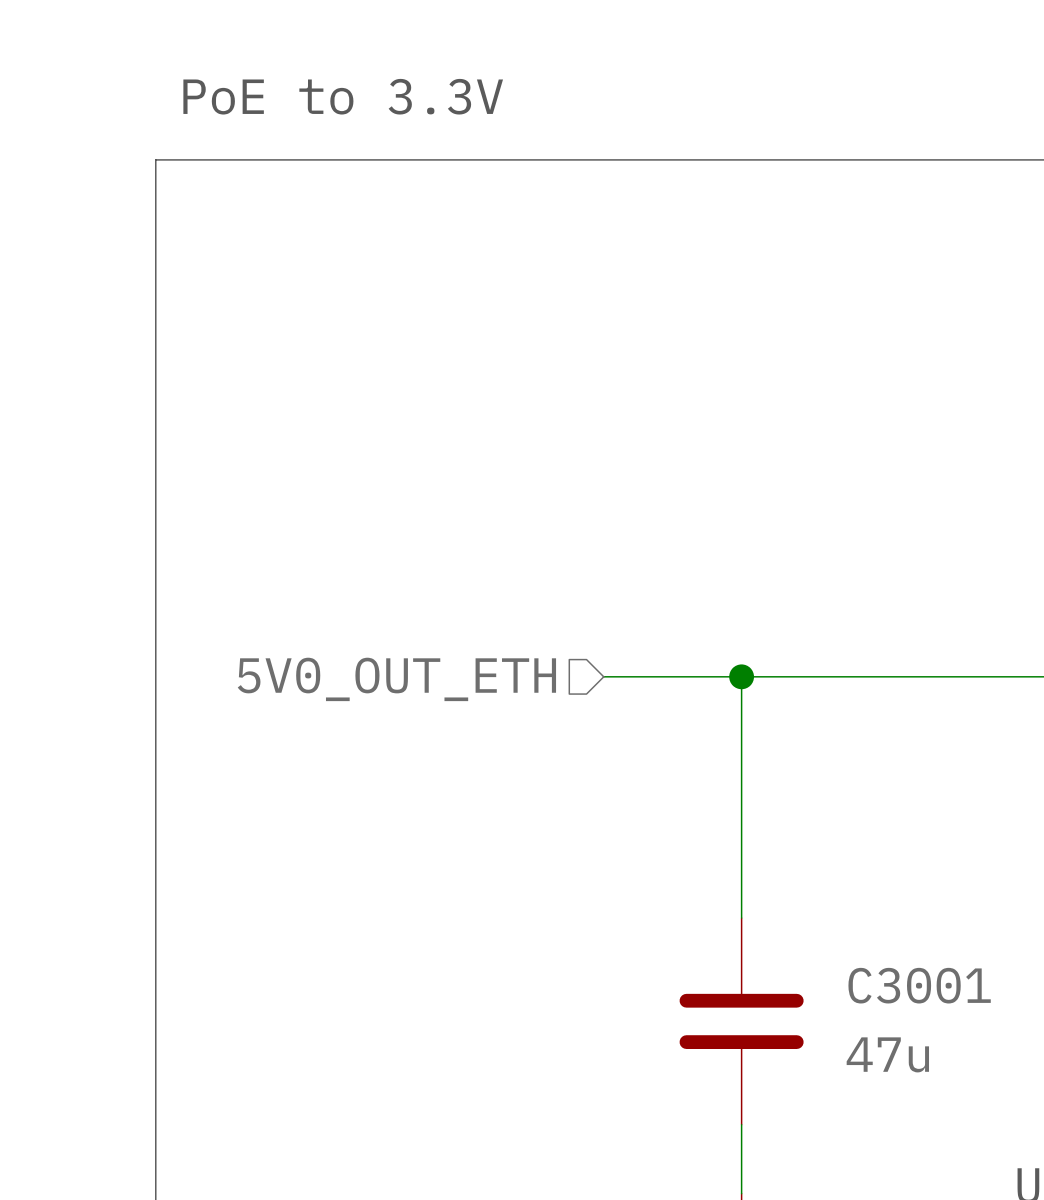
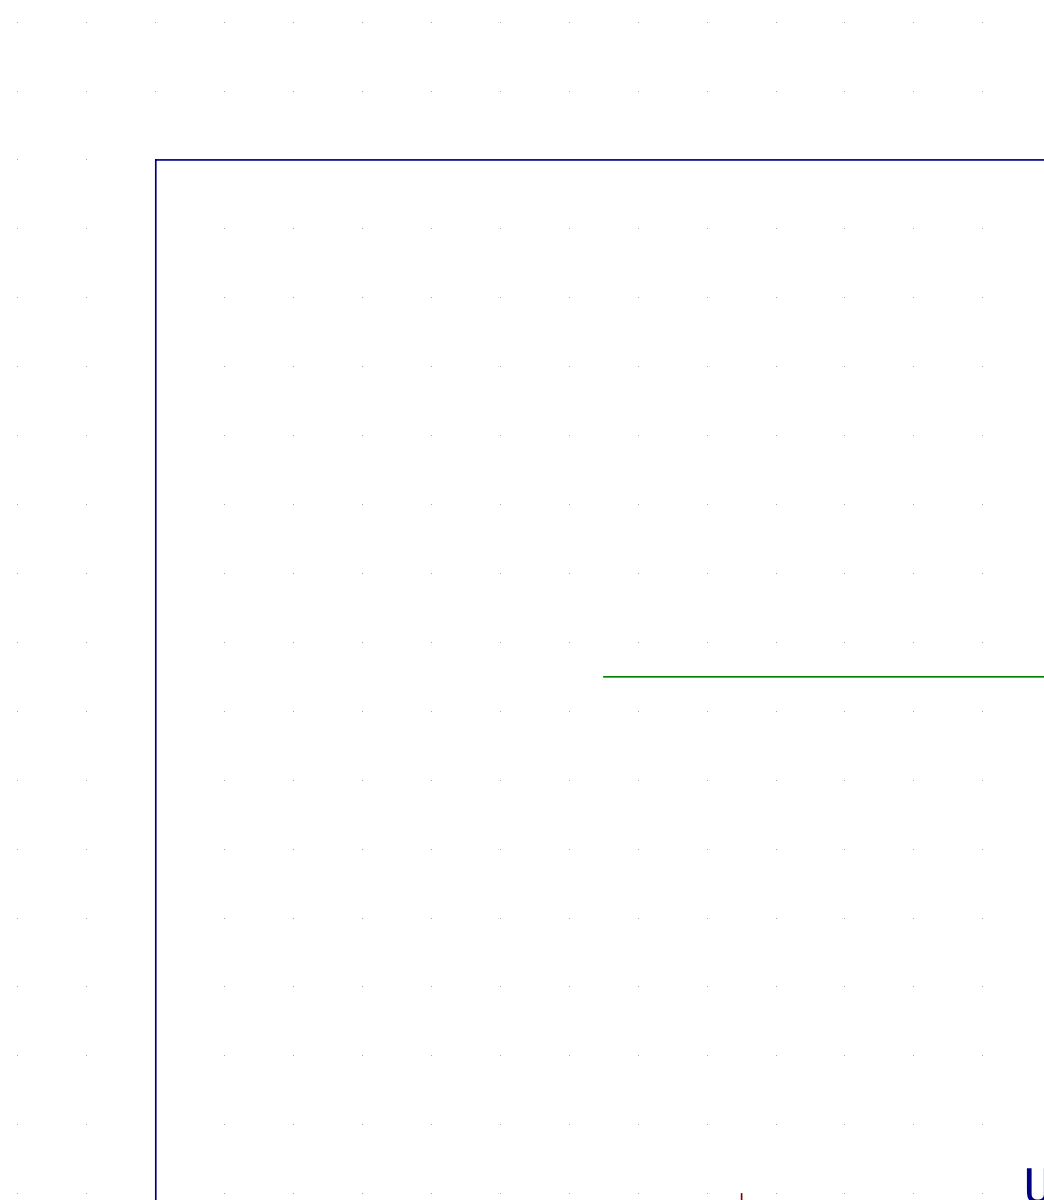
text: PoE to 3.3V (343, 96) -> none
wire: (741, 676) (741, 918) -> none
junction: (741, 676) -> none
hierarchical label: 5V0_OUT_ETH (396, 679) -> none
C3001: 47u (741, 1021) -> none
wire: (741, 1124) (741, 1193) -> none

